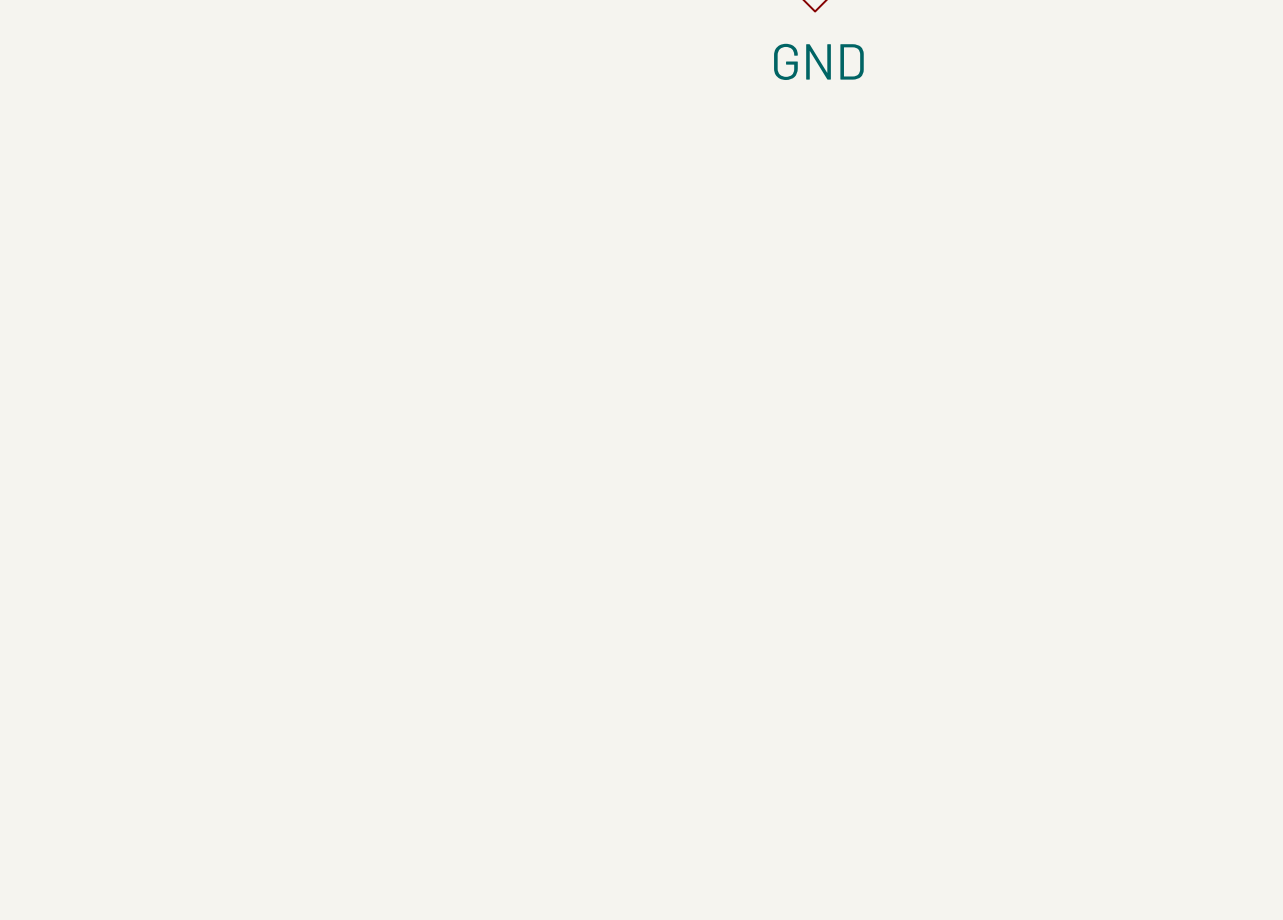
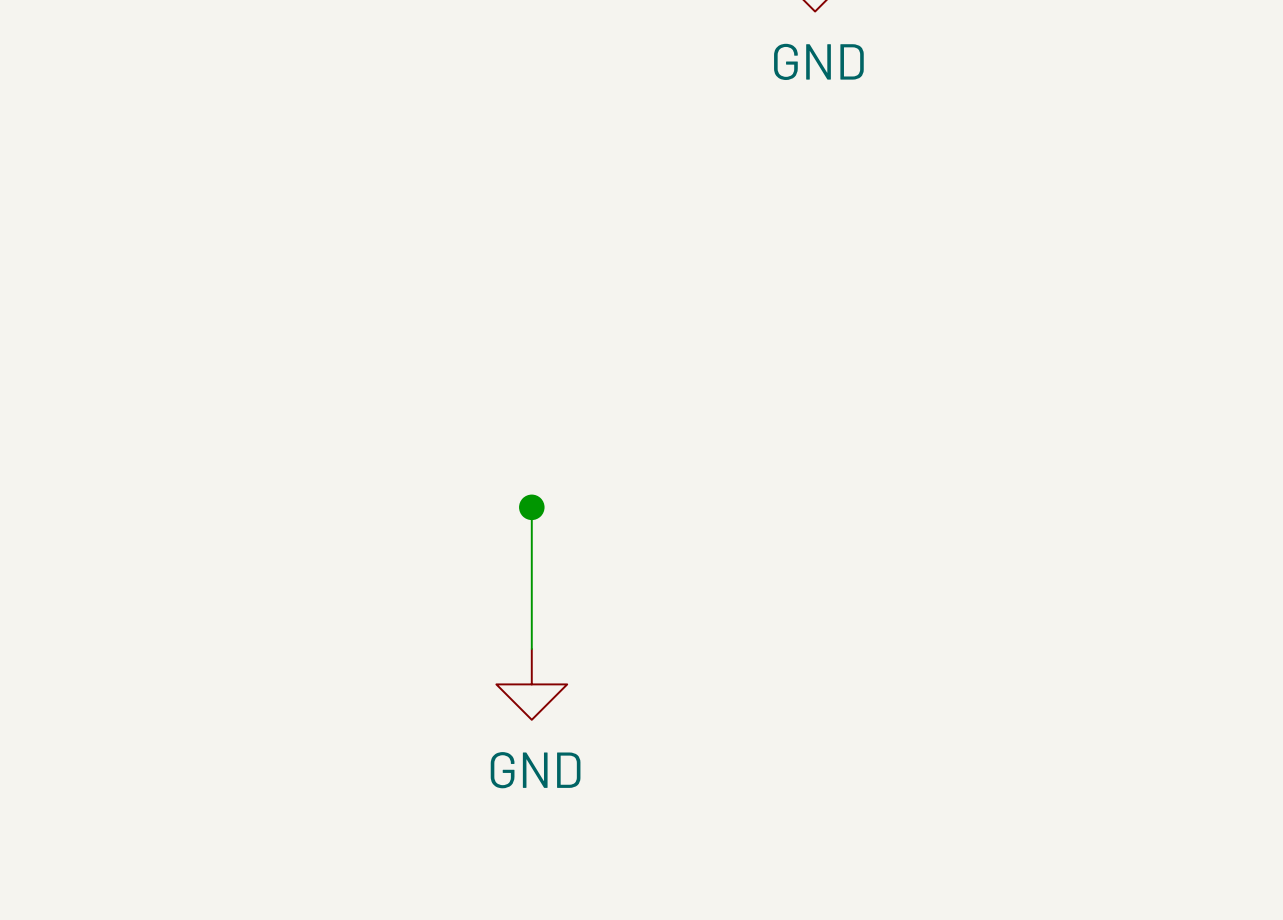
wire: none -> (531, 507) (531, 648)
junction: none -> (531, 507)
power symbol: none -> GND (531, 684)

